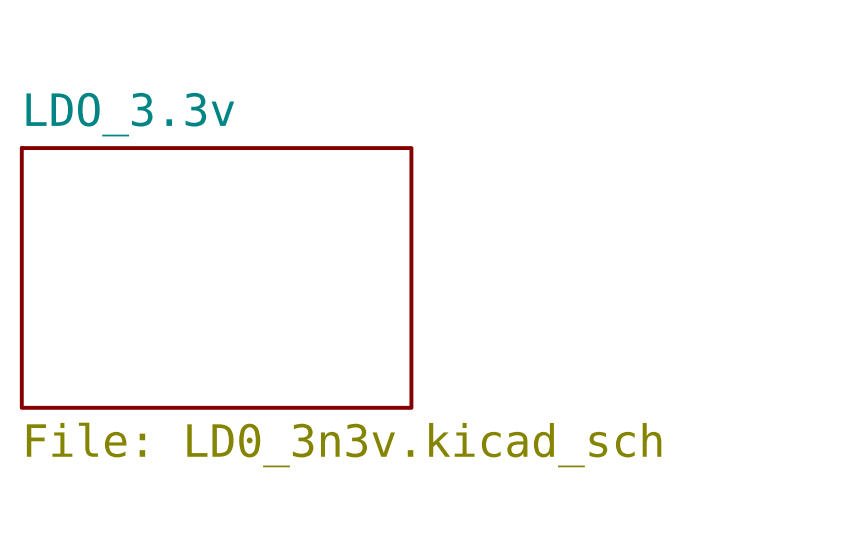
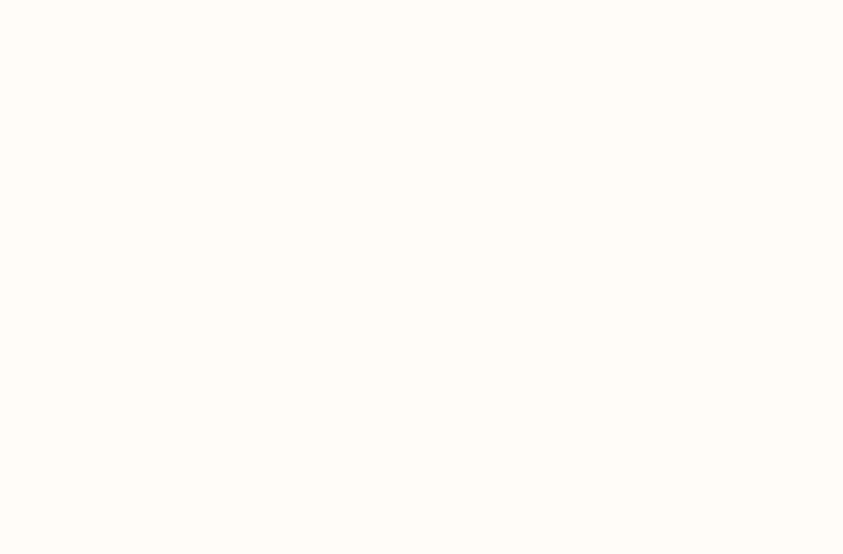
sheet LDO_3.3v: File: LD0_3n3v.kicad_sch (216, 277) -> none

